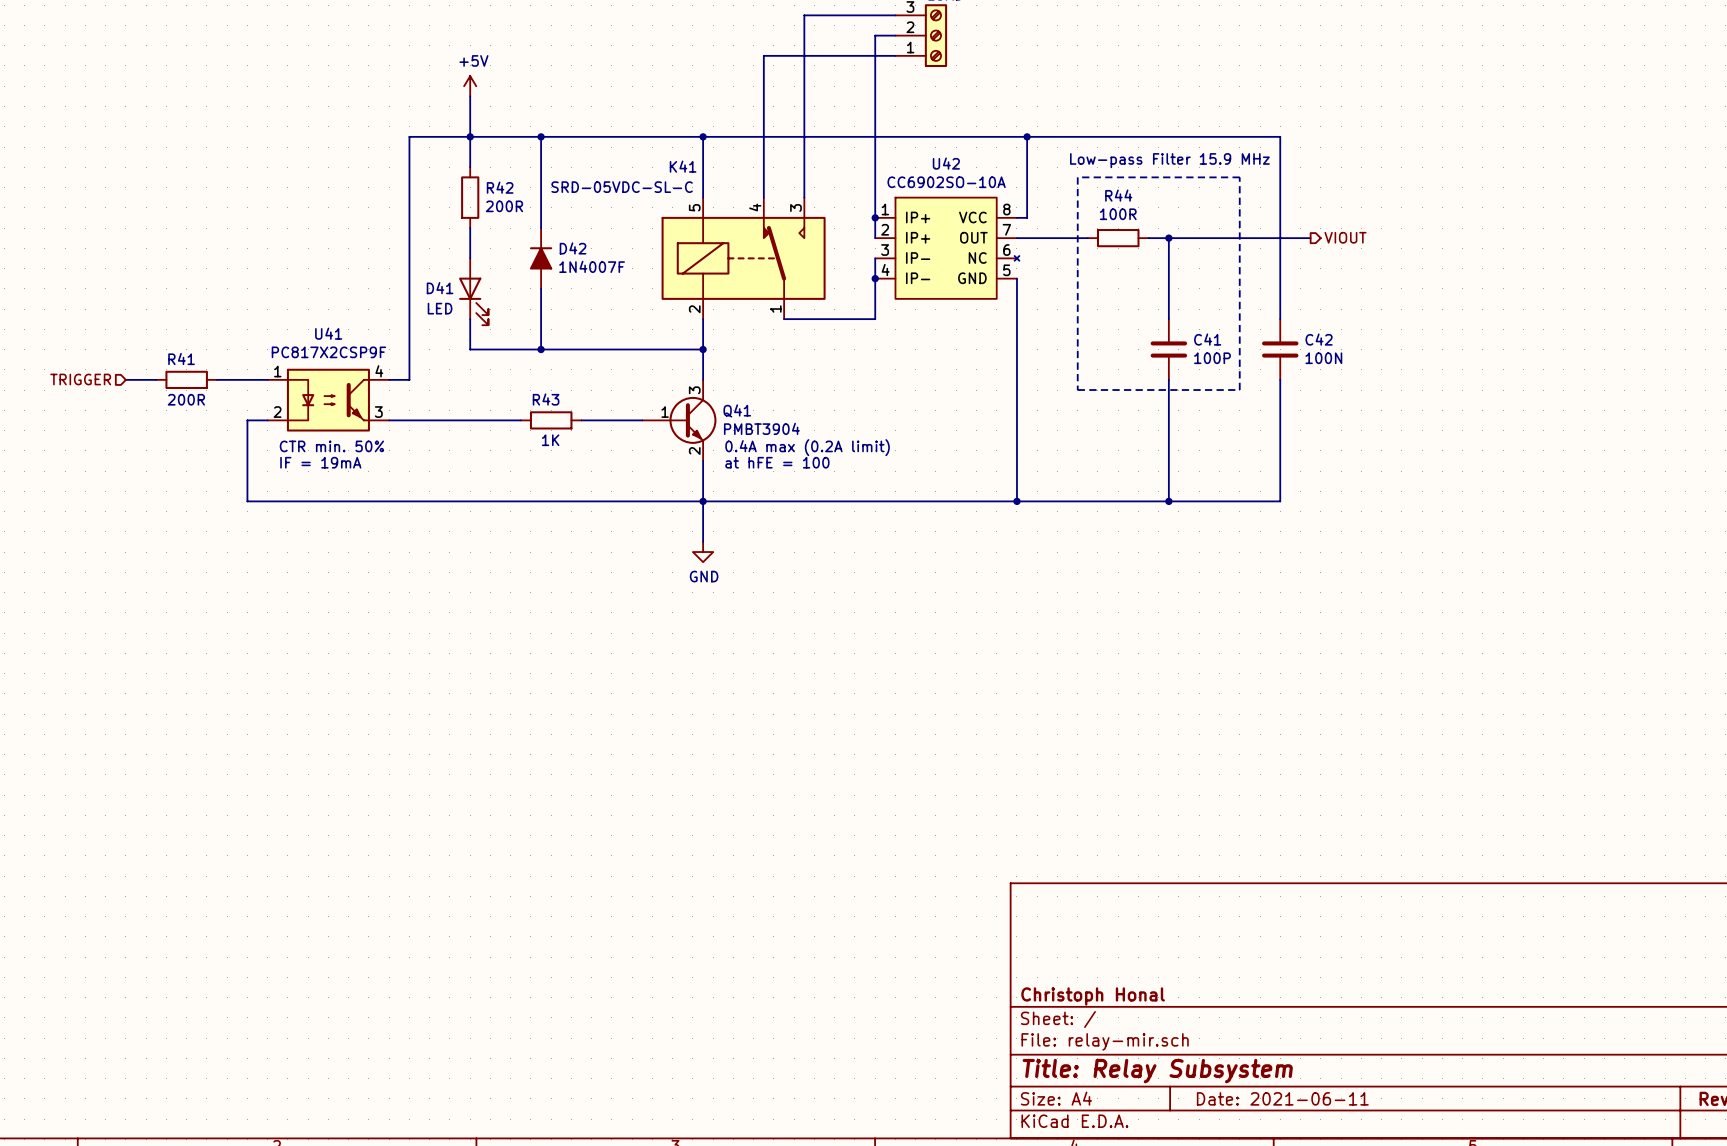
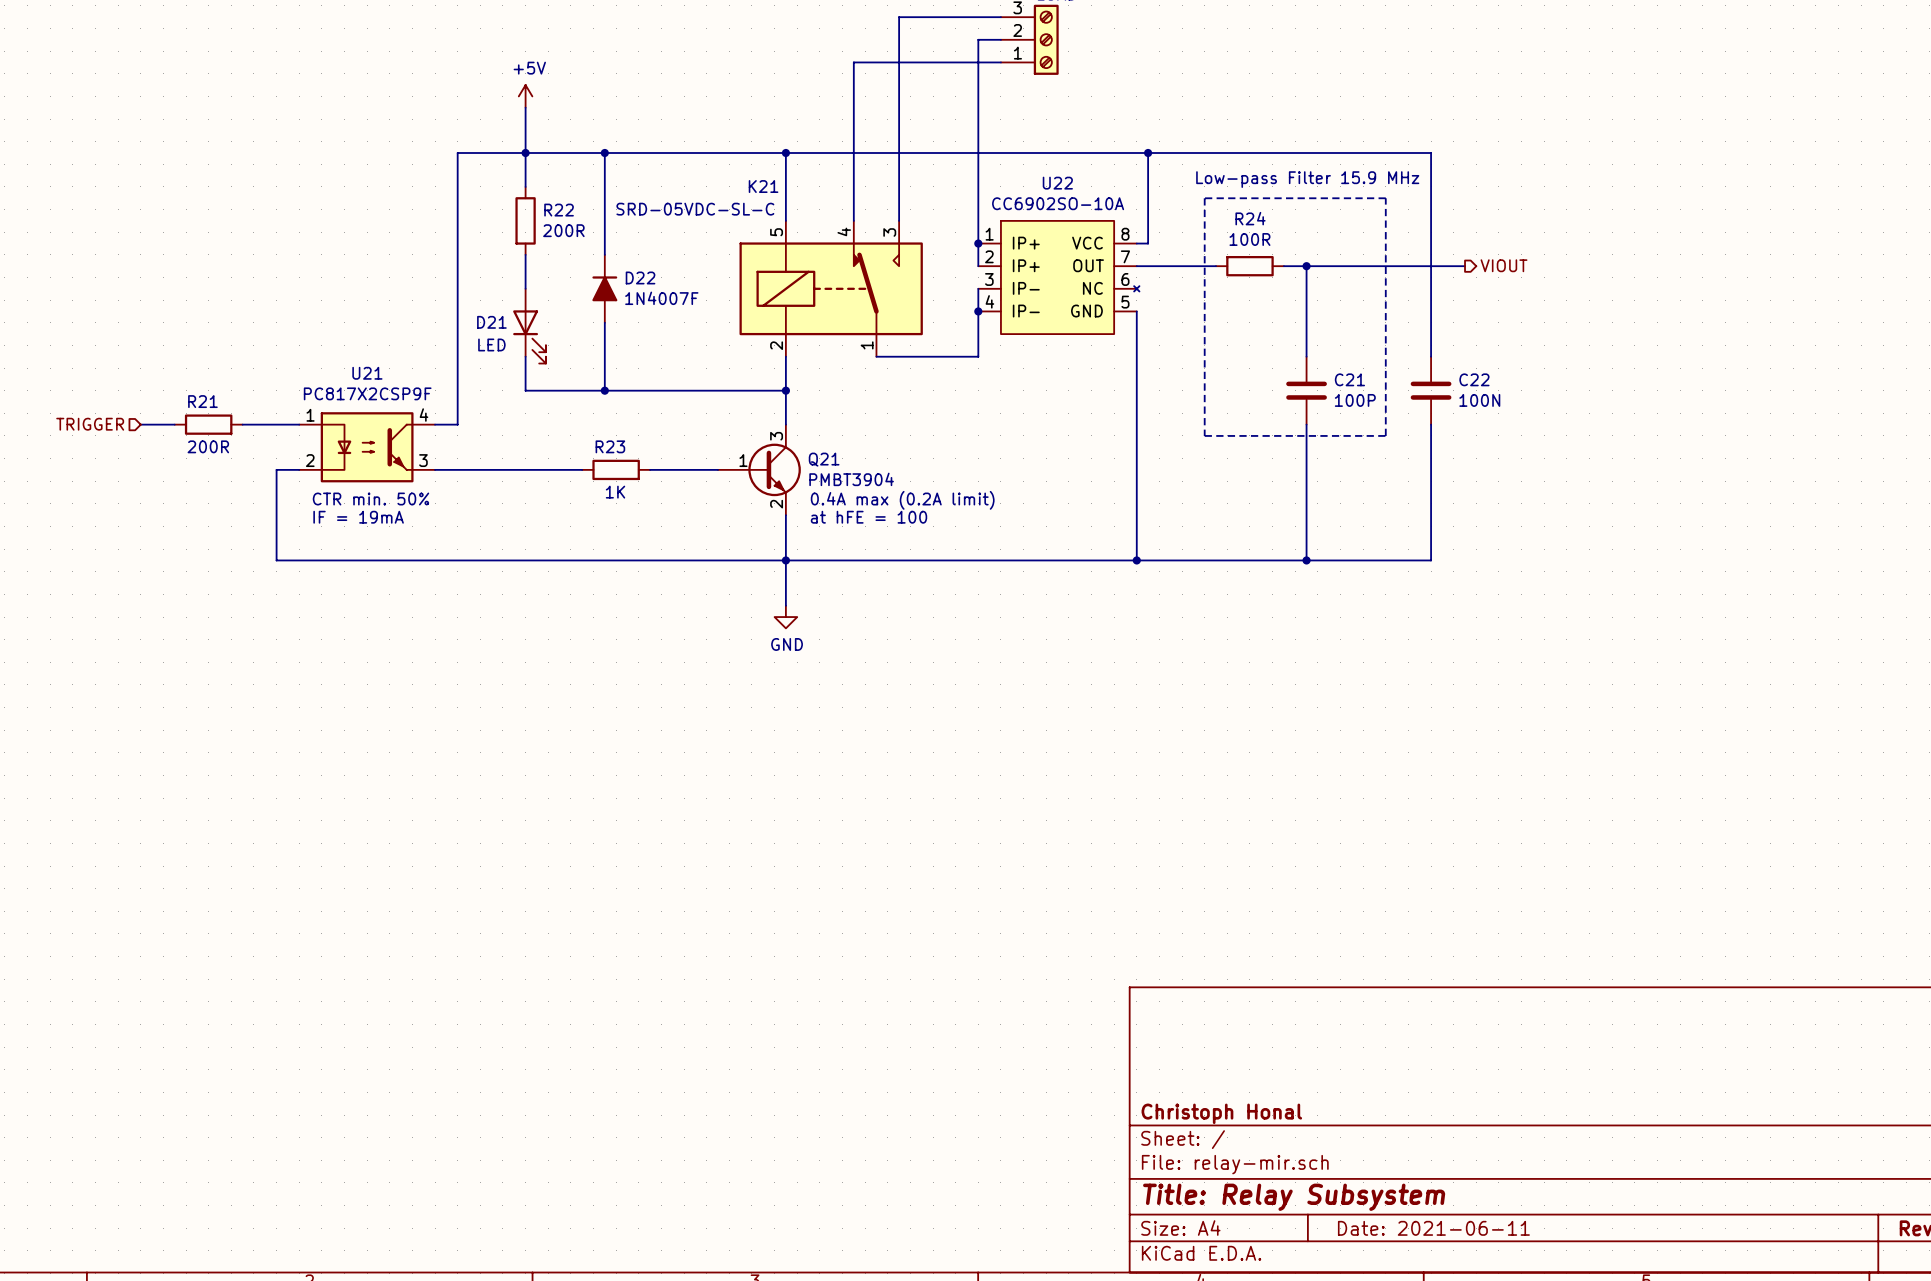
U42 name: U42 (946, 163) -> U22 (1057, 183)
K41 name: K41 (683, 166) -> K21 (763, 186)
R42 name: R42 (500, 187) -> R22 (559, 210)
R44 name: R44 (1118, 195) -> R24 (1250, 218)
D42 name: D42 (573, 248) -> D22 (640, 277)
D41 name: D41 (440, 288) -> D21 (491, 322)
U41 name: U41 (328, 333) -> U21 (367, 373)
C41 name: C41 (1207, 339) -> C21 (1349, 379)
C42 name: C42 (1319, 339) -> C22 (1474, 379)
R41 name: R41 (181, 359) -> R21 (202, 401)
R43 name: R43 (546, 399) -> R23 (610, 446)
Q41 name: Q41 (737, 410) -> Q21 (824, 459)

